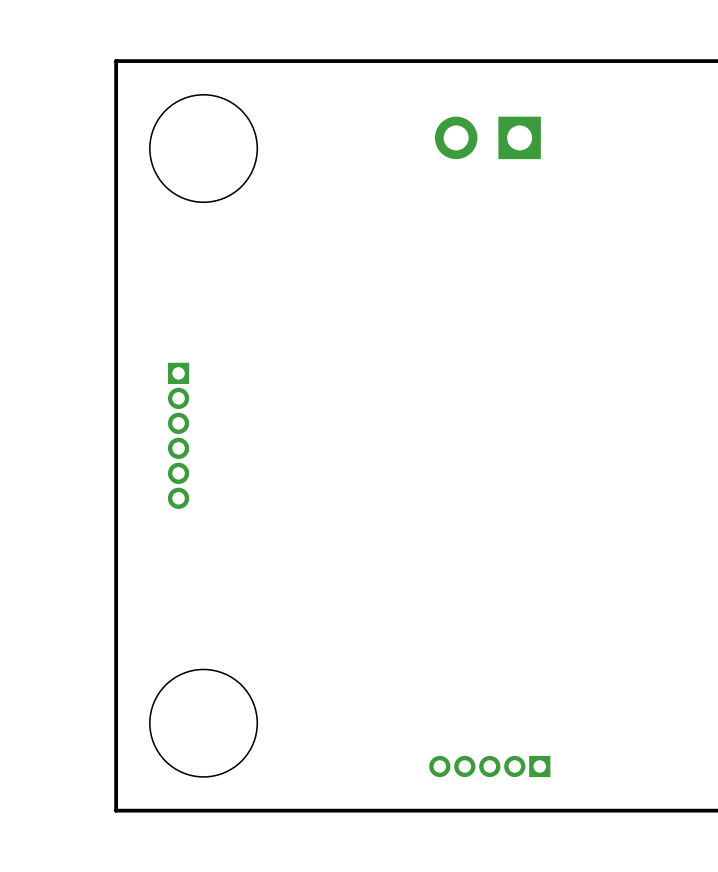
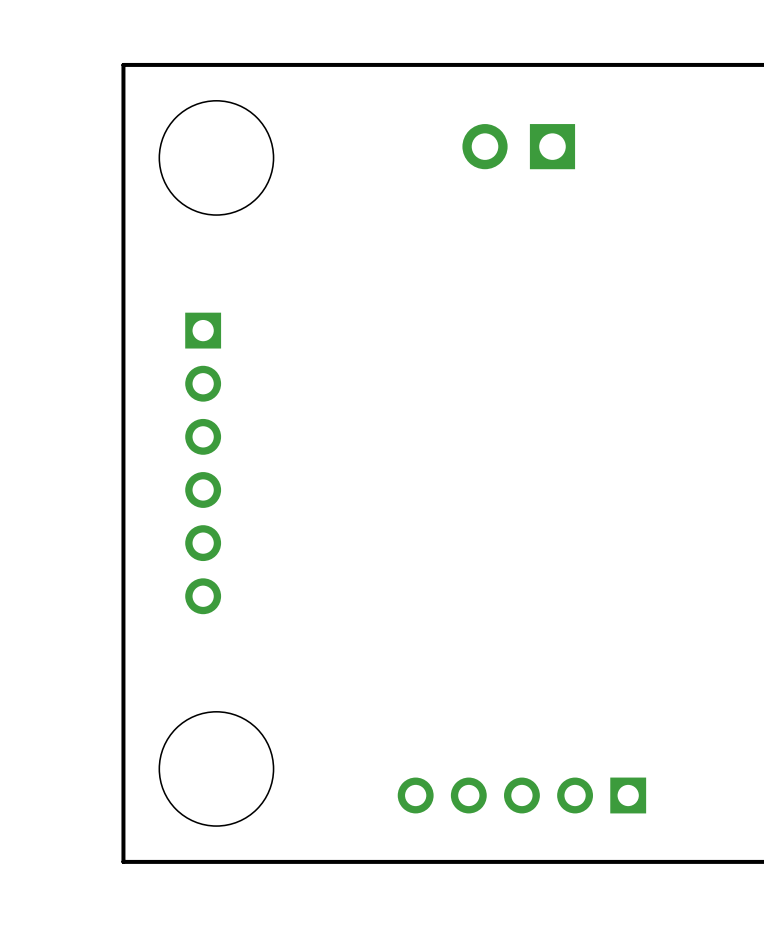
part footprint: [167, 362, 190, 509] -> [185, 312, 222, 615]
part footprint: [429, 755, 551, 778] -> [397, 777, 647, 814]

